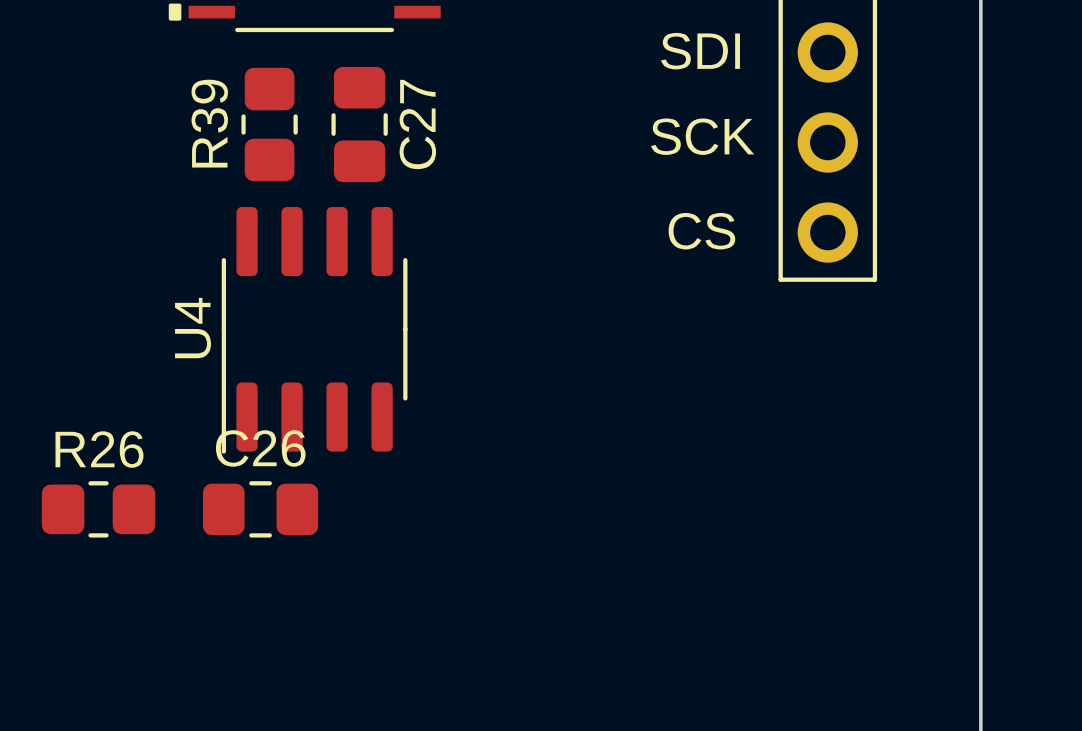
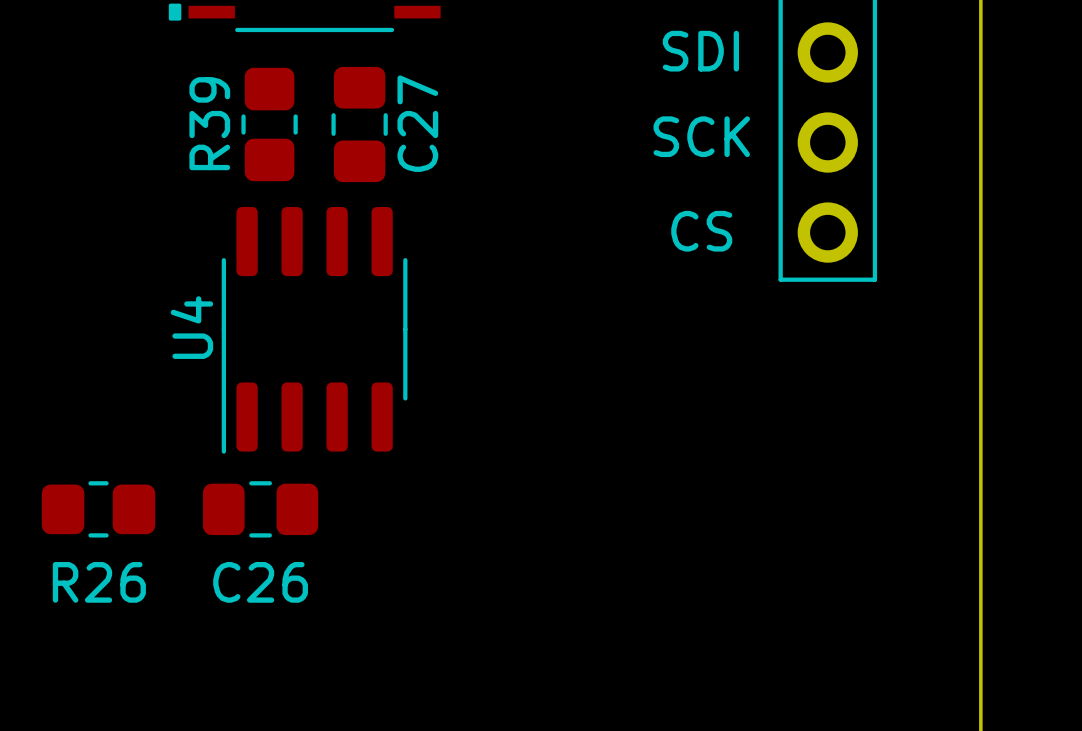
C26 name position: C26 (260, 448) -> C26 (260, 582)
R26 name position: R26 (99, 449) -> R26 (99, 582)

